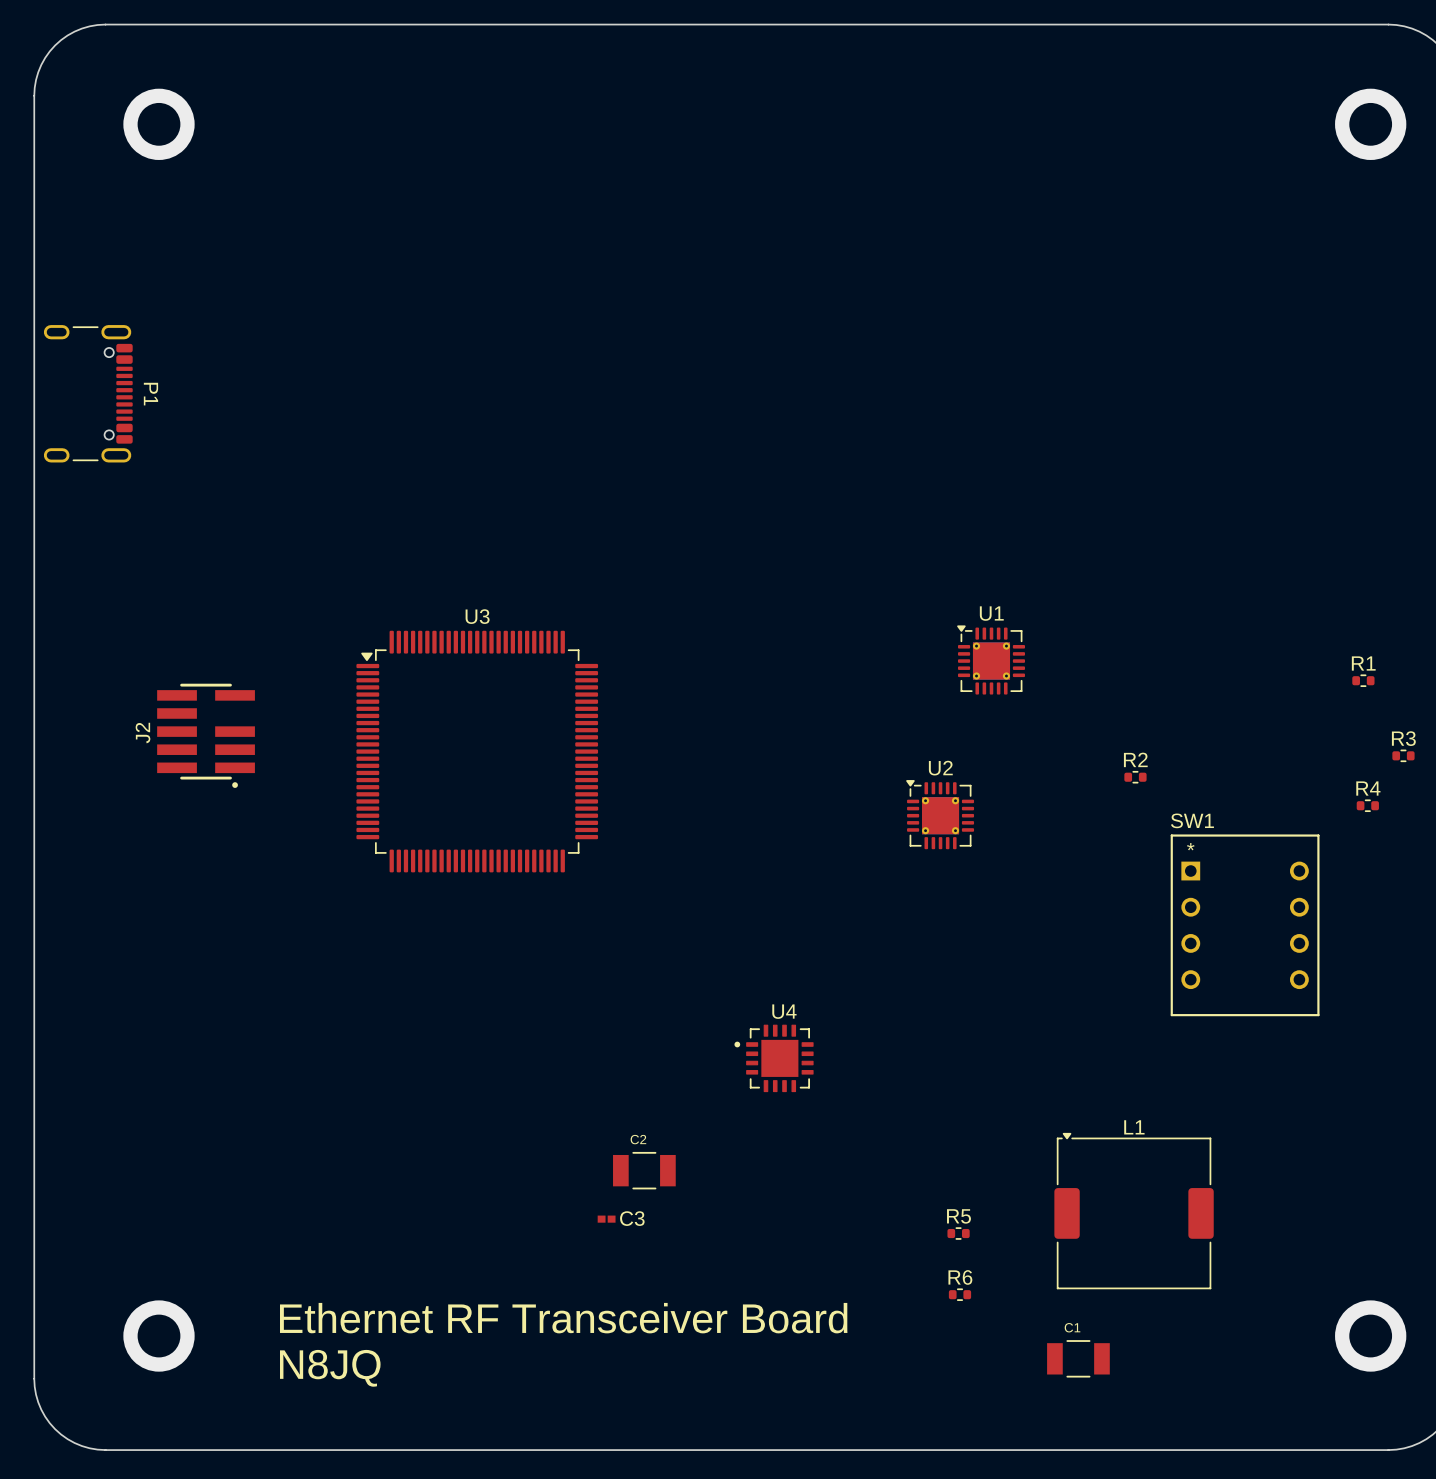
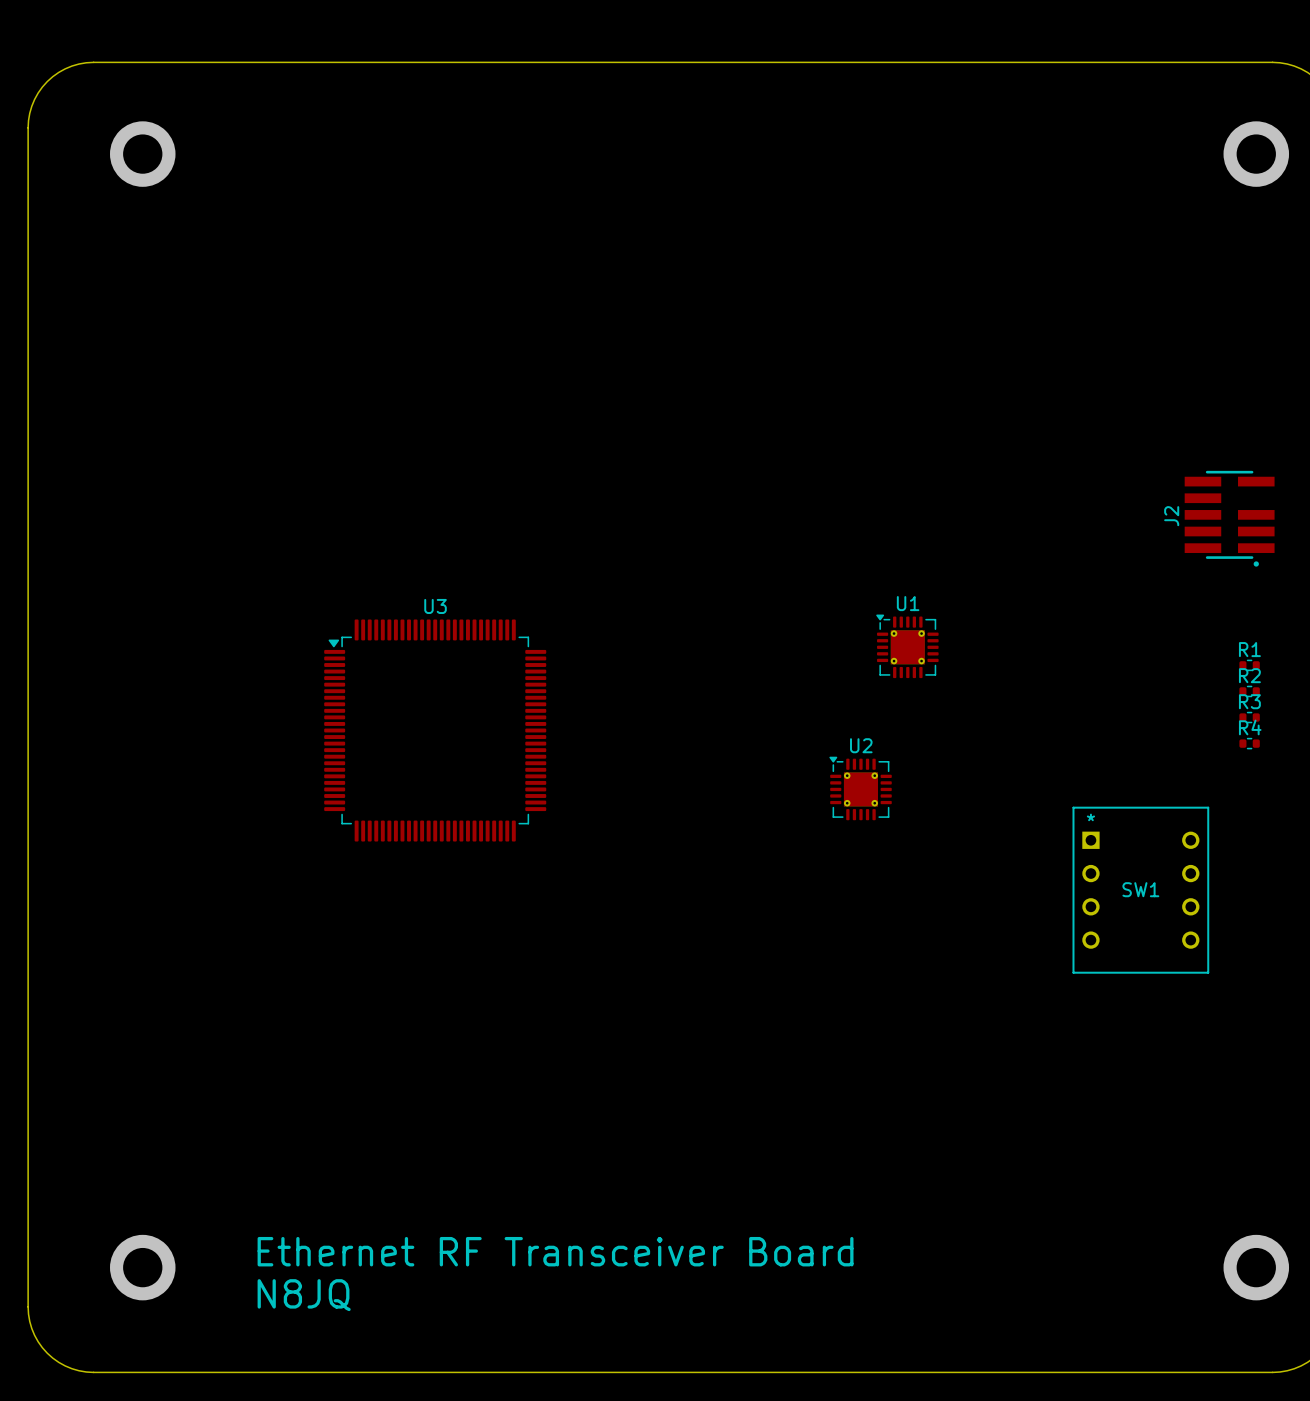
P1: (88, 393) -> none
J2 position: (206, 735) -> (1229, 518)
R3 position: (1403, 755) -> (1249, 717)
R2 position: (1135, 777) -> (1249, 691)
R4 position: (1367, 805) -> (1249, 743)
SW1 name position: SW1 (1192, 820) -> SW1 (1140, 889)
U4: (774, 1058) -> none
C2: (644, 1170) -> none
L1: (1134, 1211) -> none
C3: (606, 1219) -> none
R5: (958, 1233) -> none
R6: (959, 1294) -> none
C1: (1078, 1358) -> none

